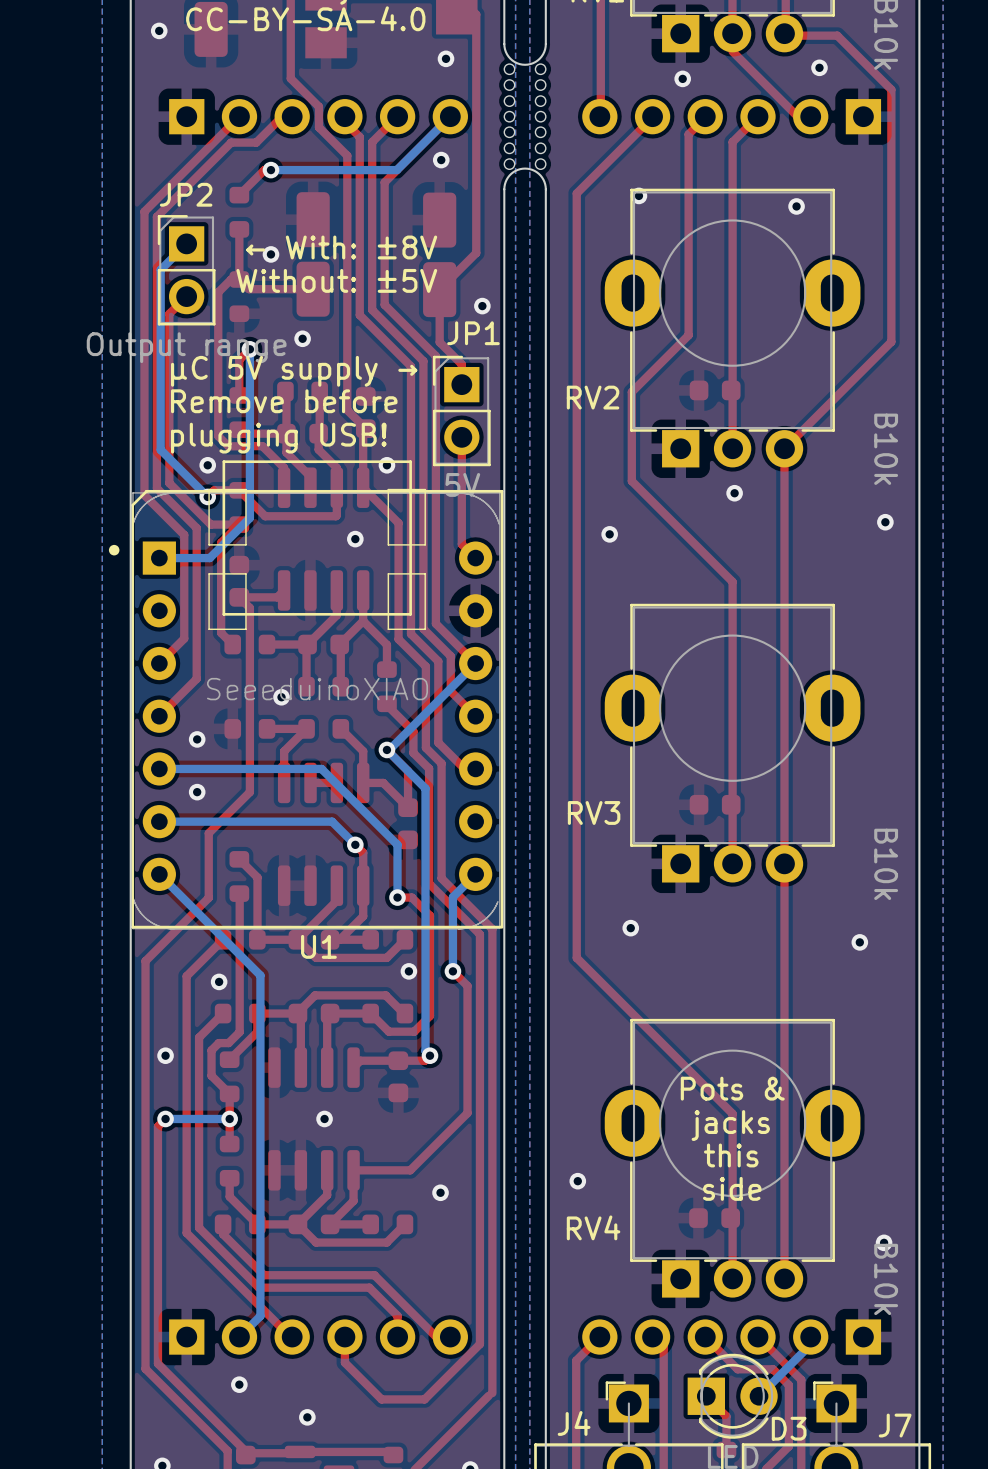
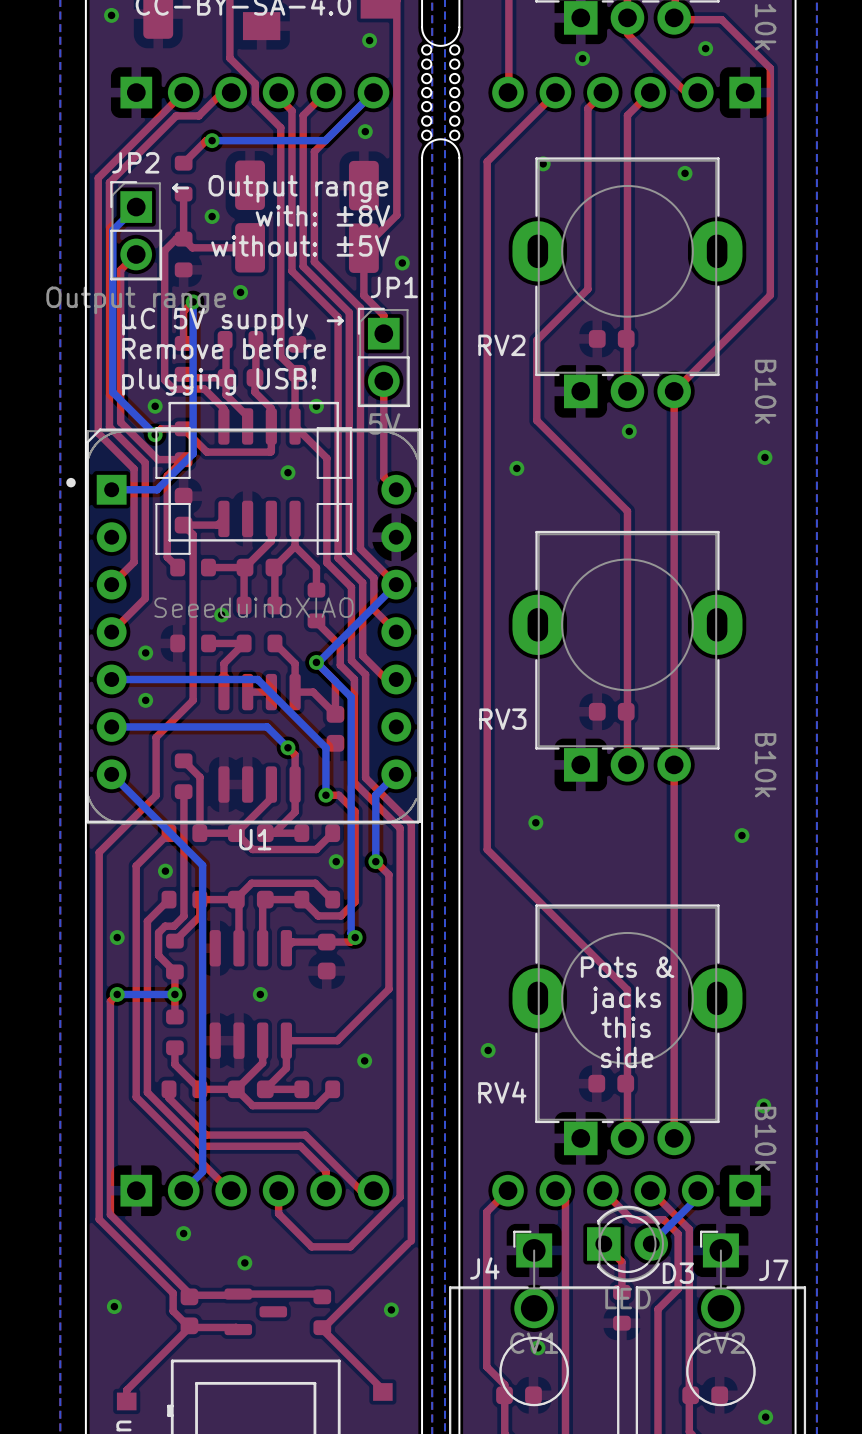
text: none -> ← Output range (280, 188)
text: ← With: ±8V (341, 247) -> none
text: none -> with: ±8V (322, 215)
text: Without: ±5V (336, 280) -> none
text: none -> without: ±5V (300, 245)

